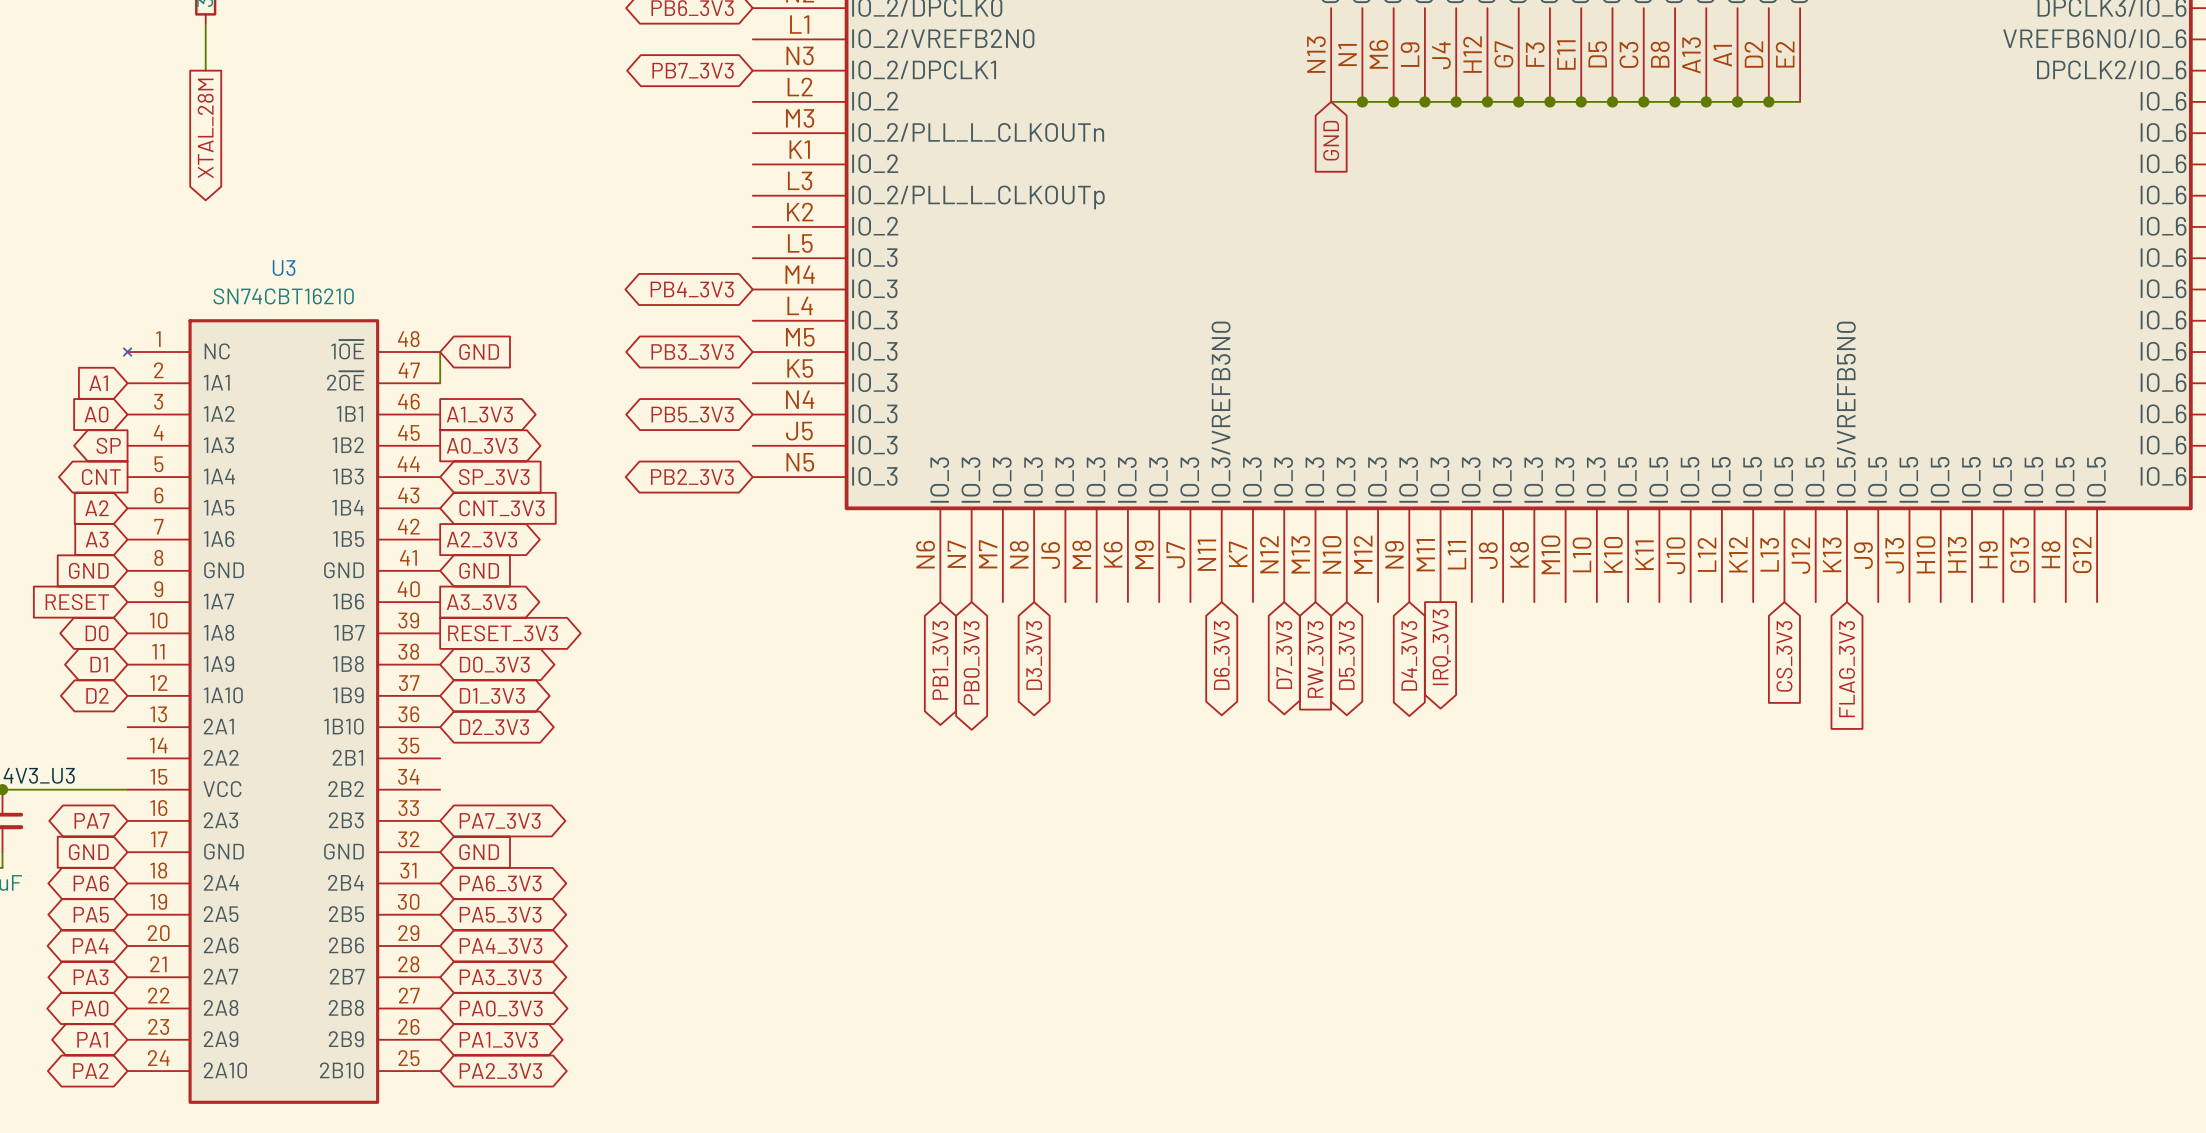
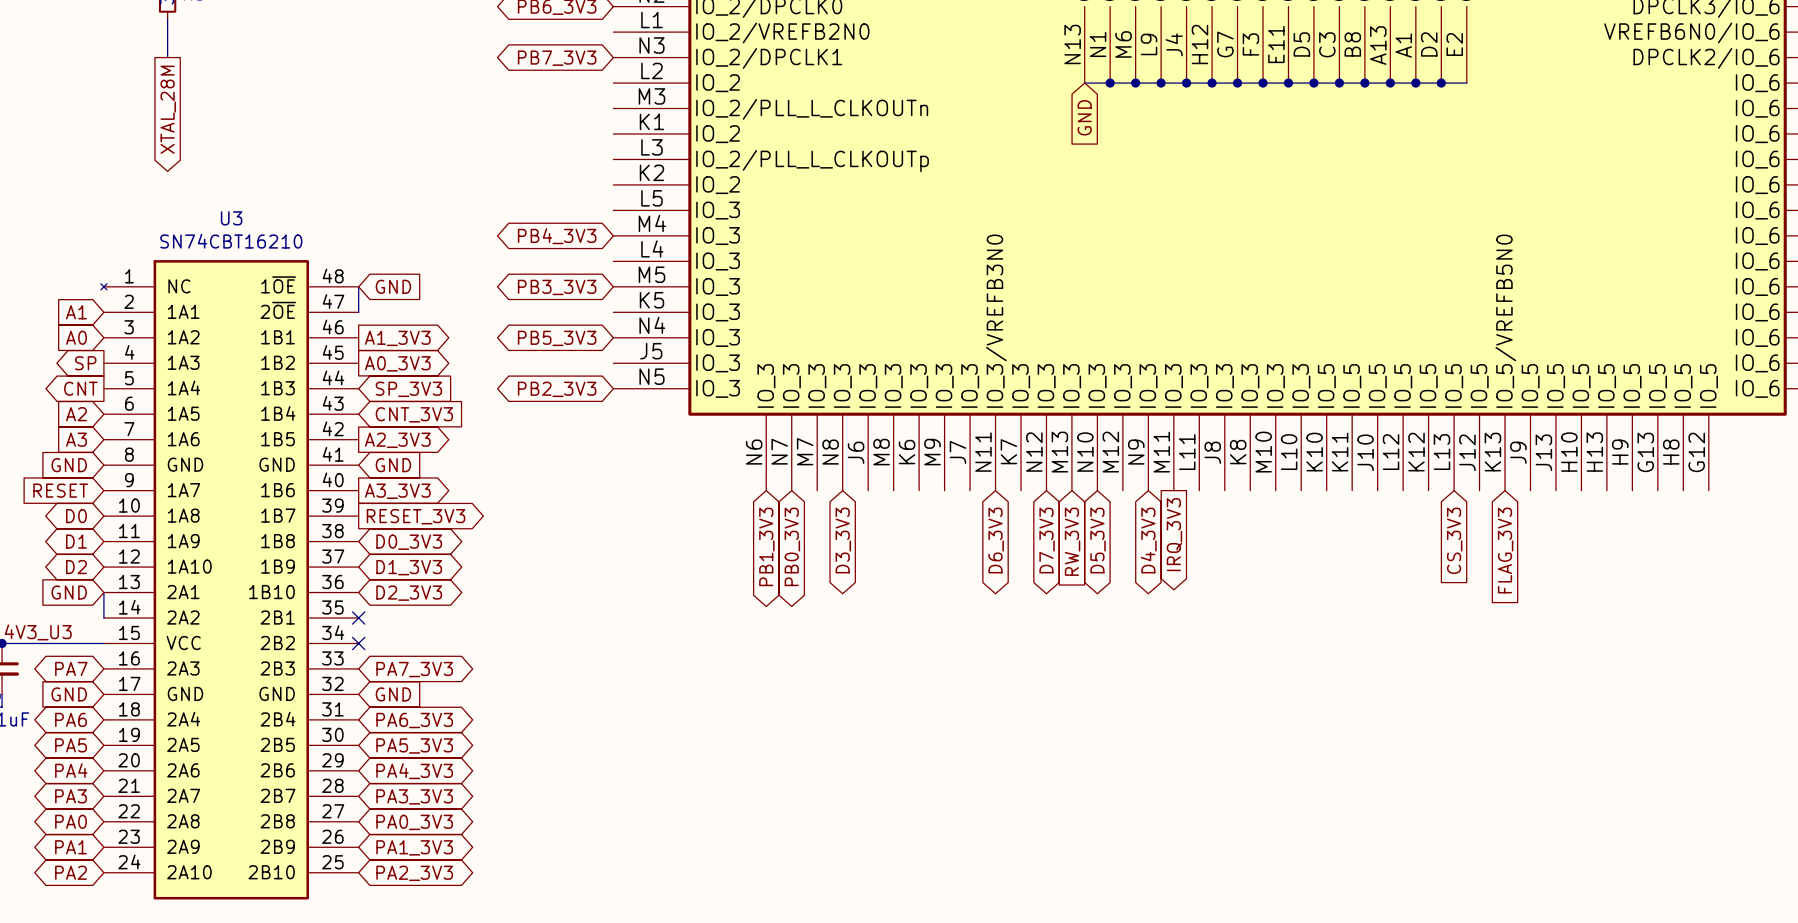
global label: none -> GND (69, 592)
wire: none -> (103, 592) (103, 618)
no-connect mark: none -> (358, 618)
no-connect mark: none -> (358, 643)

